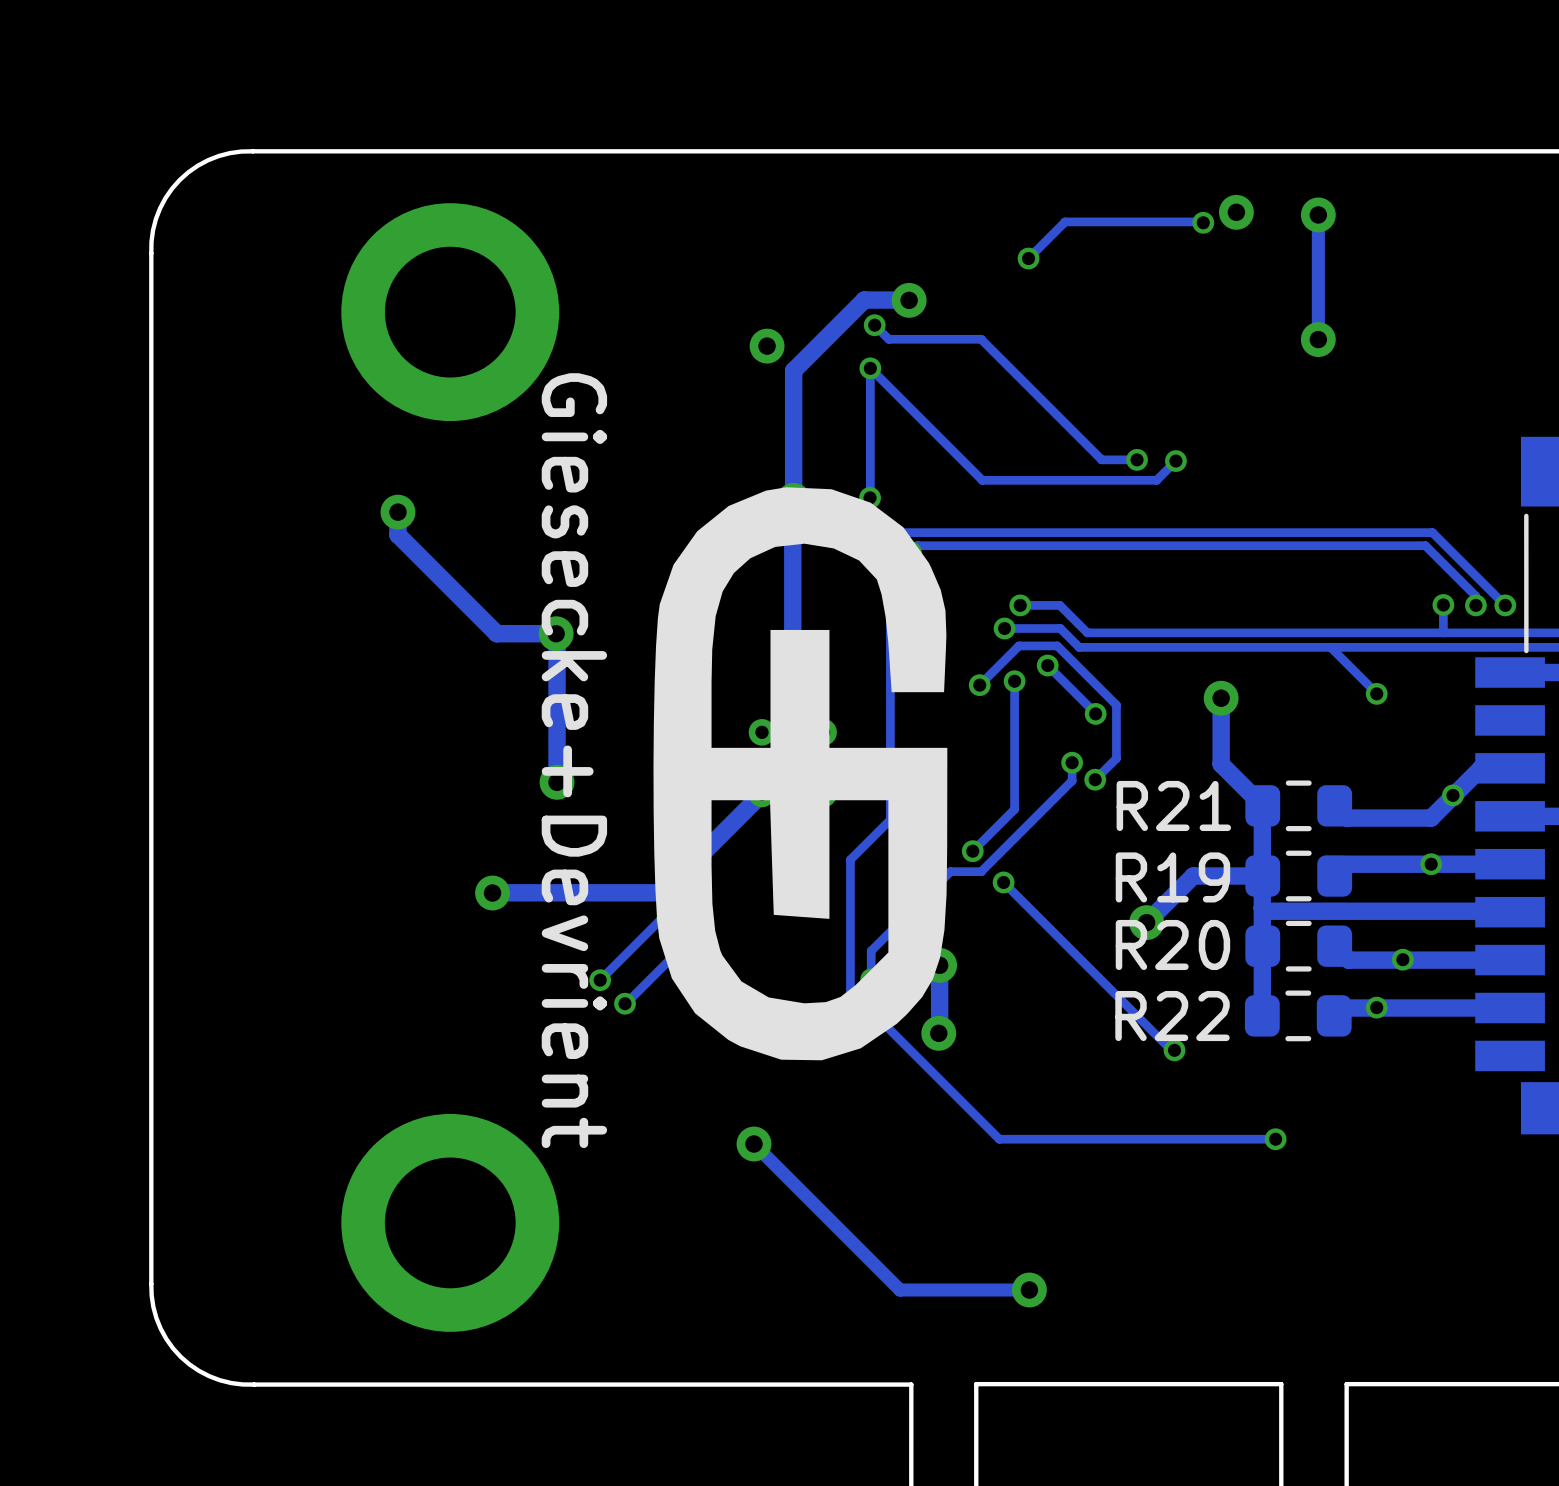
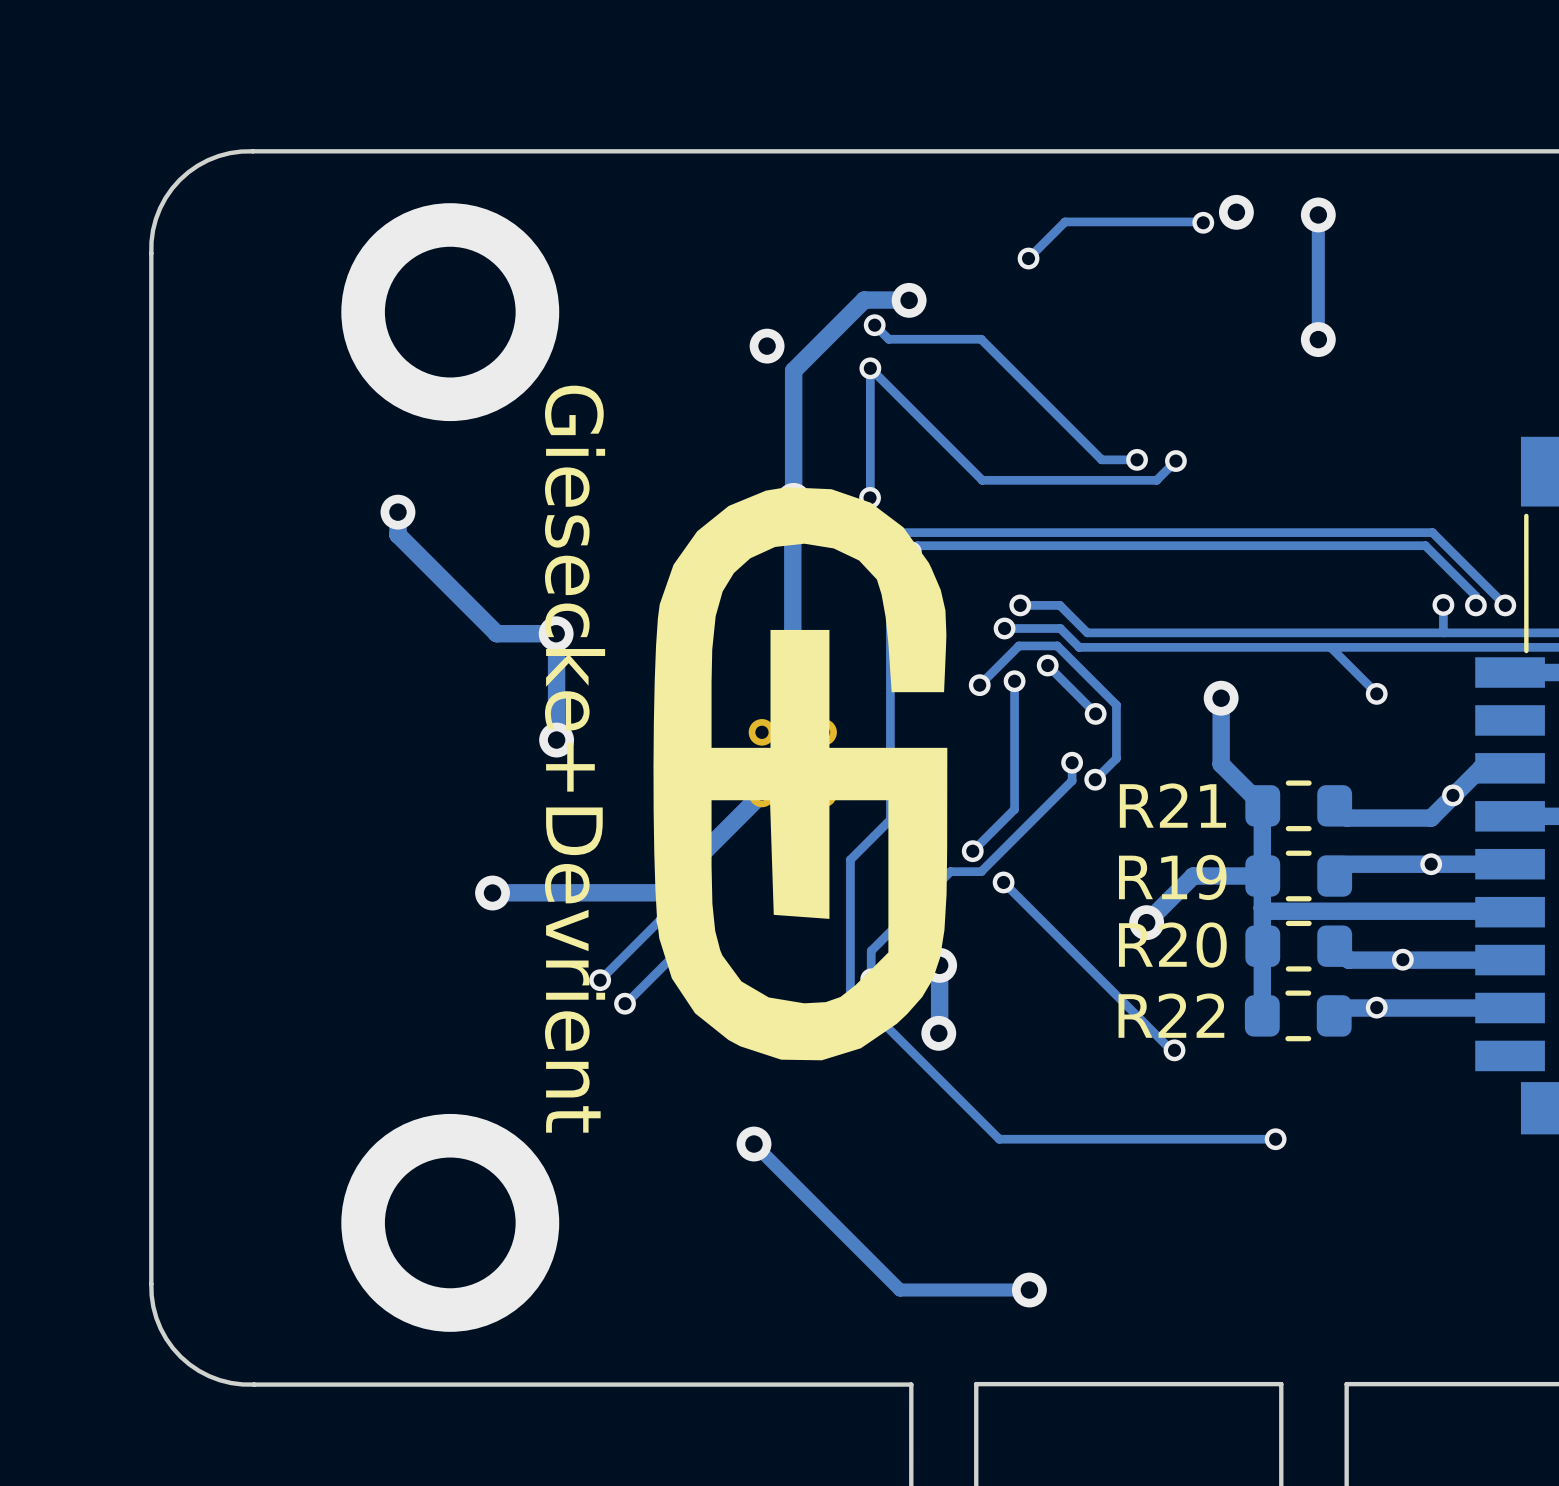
track: (557, 634) (557, 782) -> (556, 634) (556, 740)
via position: (557, 782) -> (556, 740)

